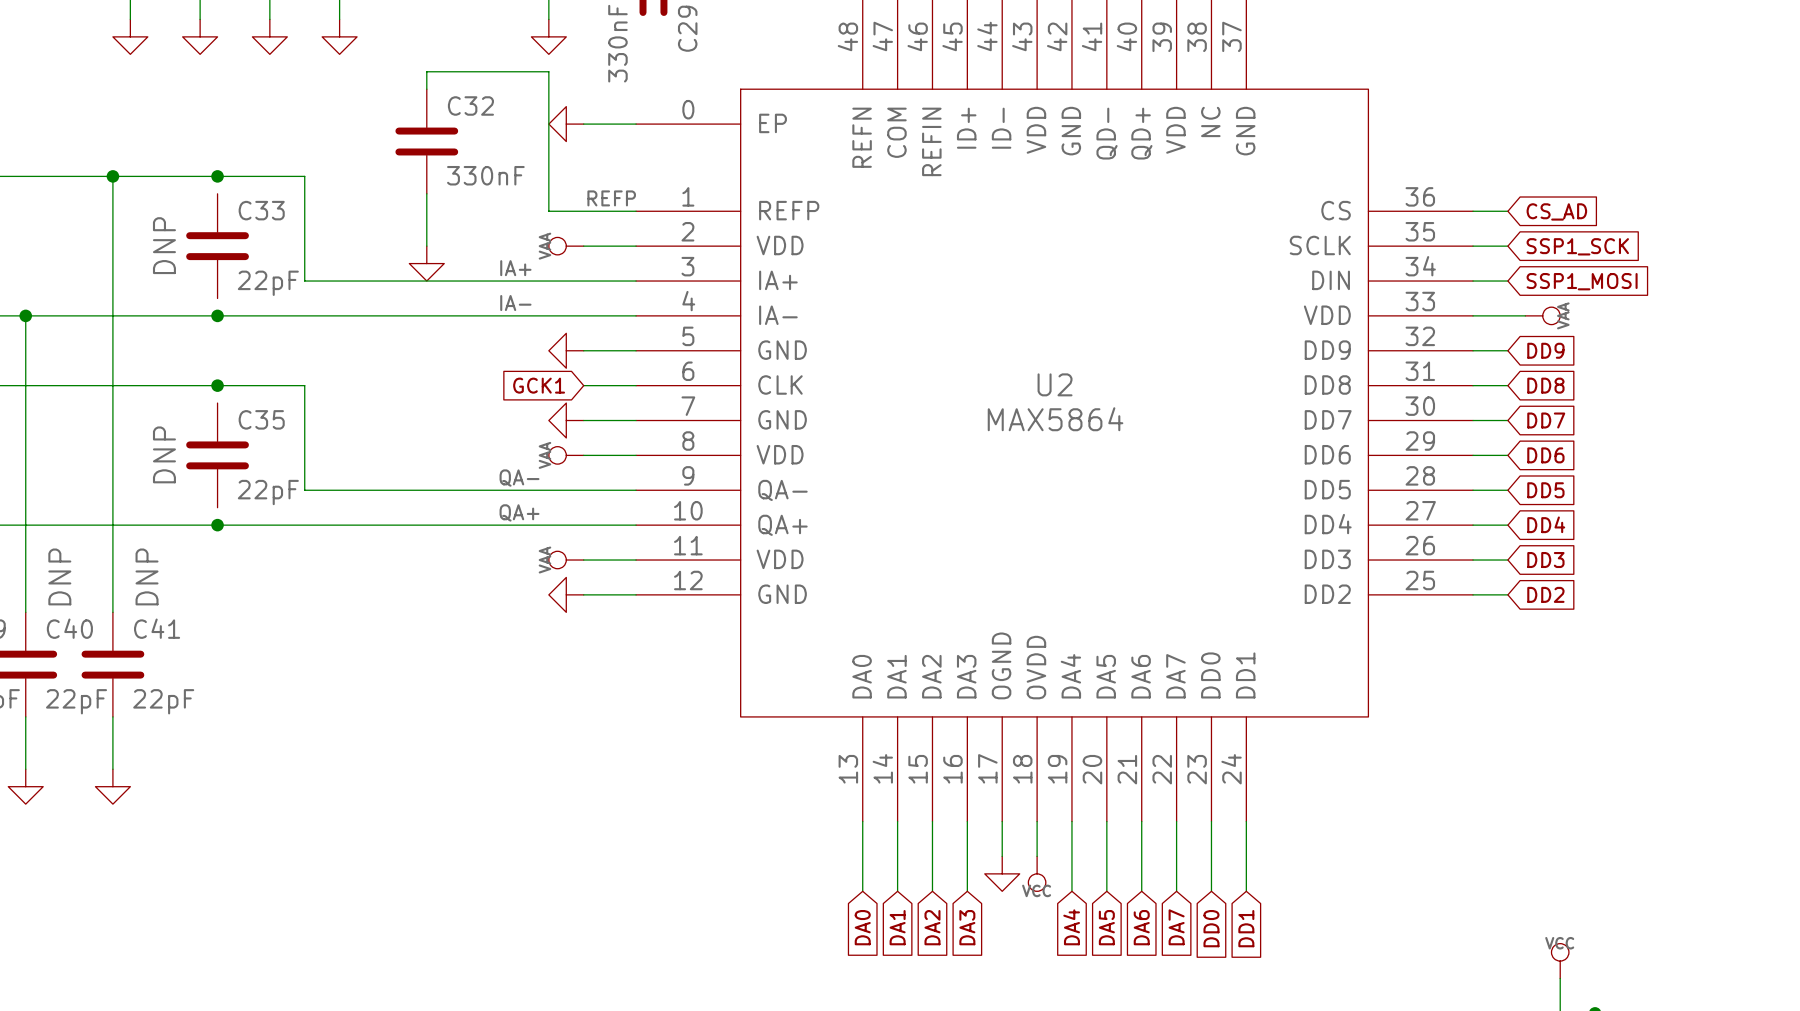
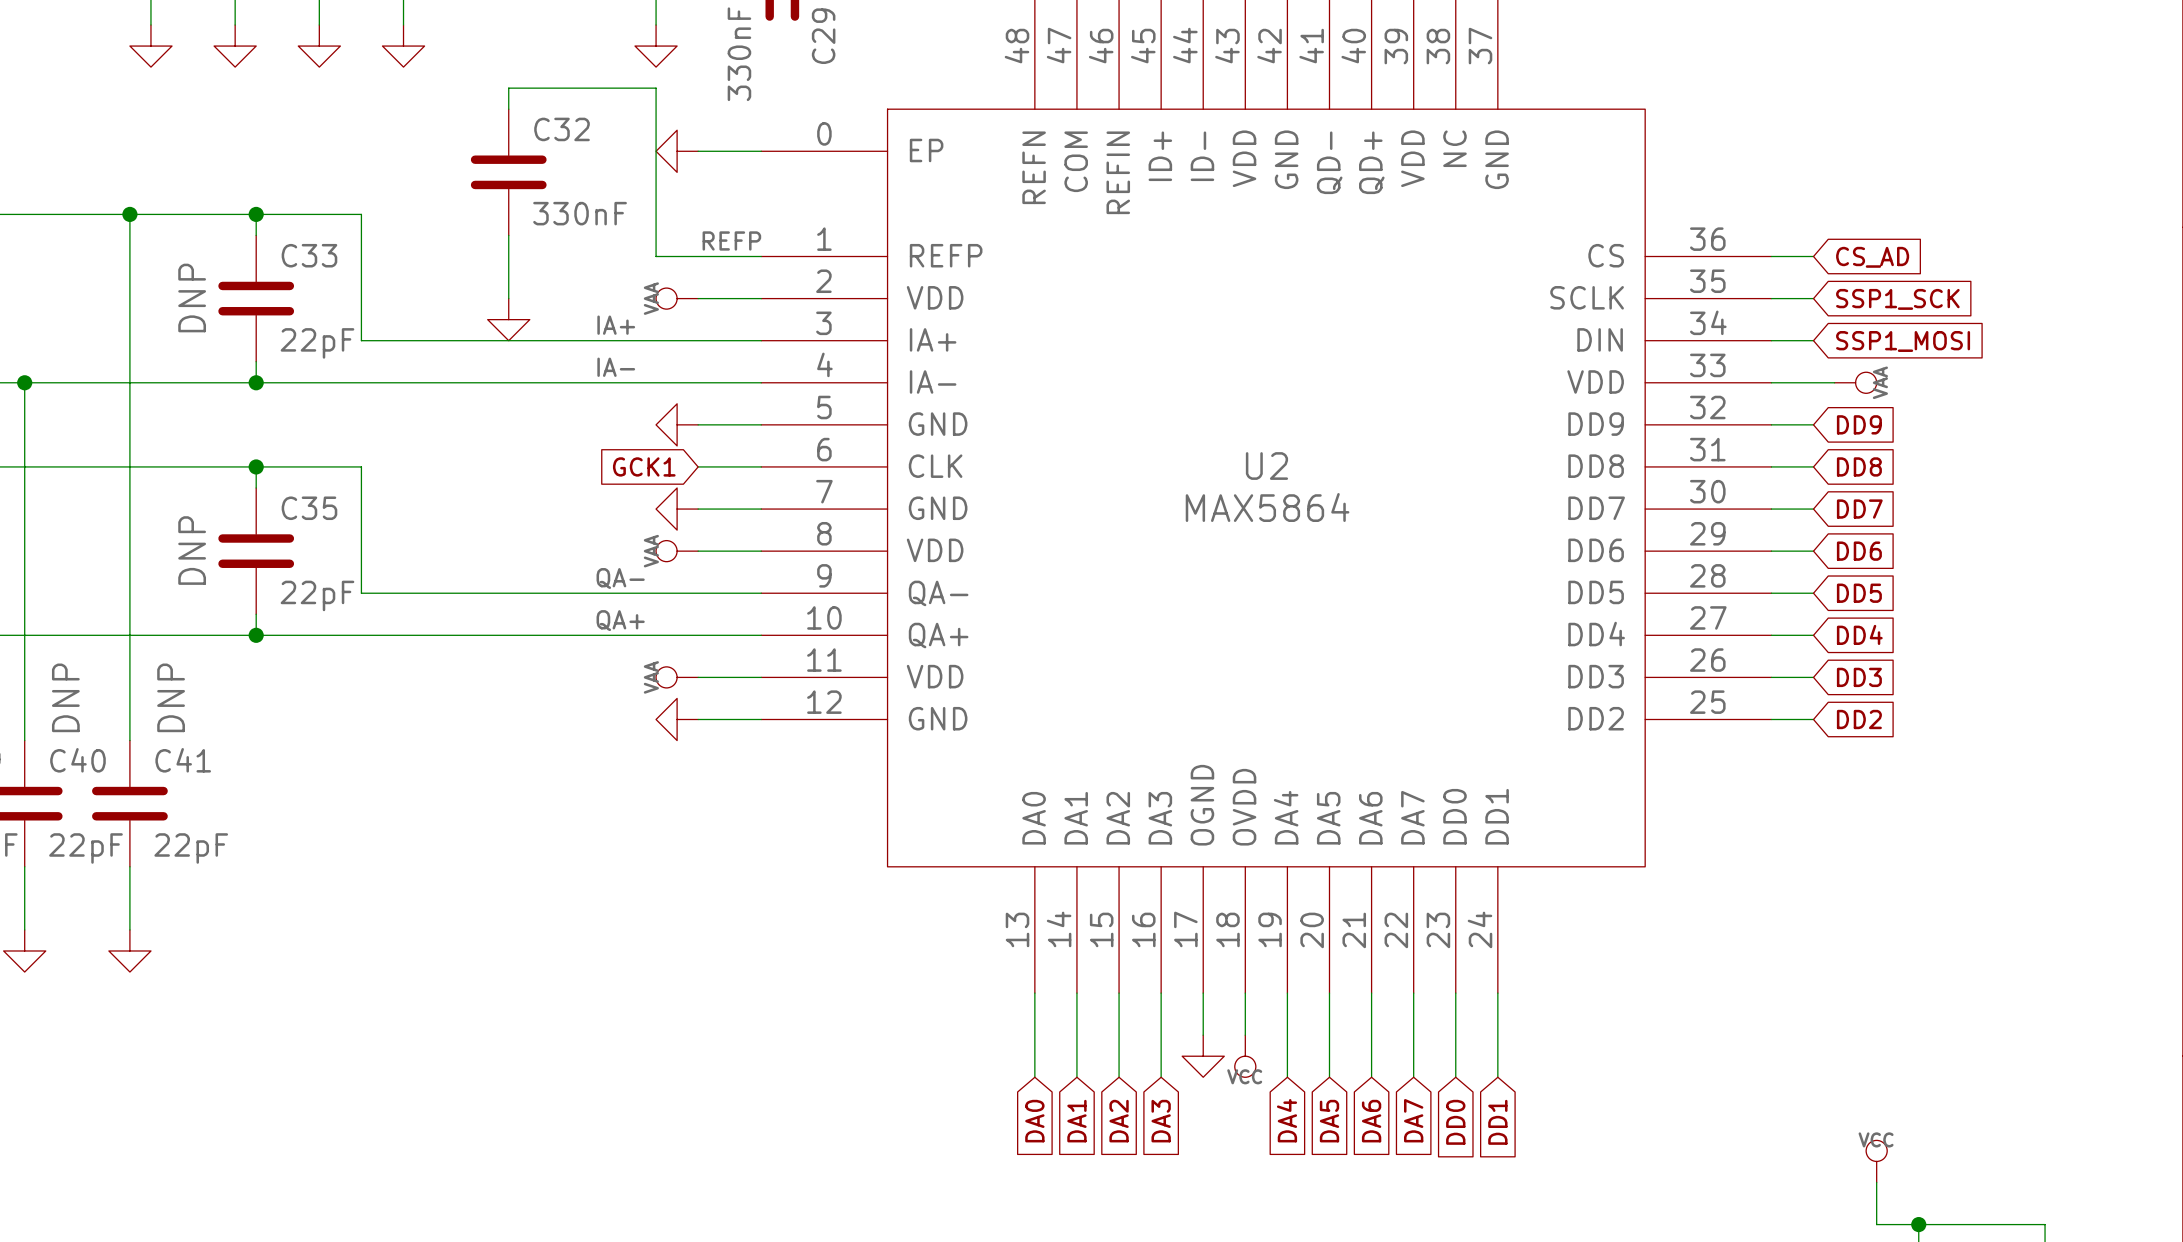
wire: none -> (256, 214) (256, 235)
wire: none -> (256, 361) (256, 382)
wire: none -> (256, 466) (256, 488)
wire: none -> (256, 614) (256, 635)

